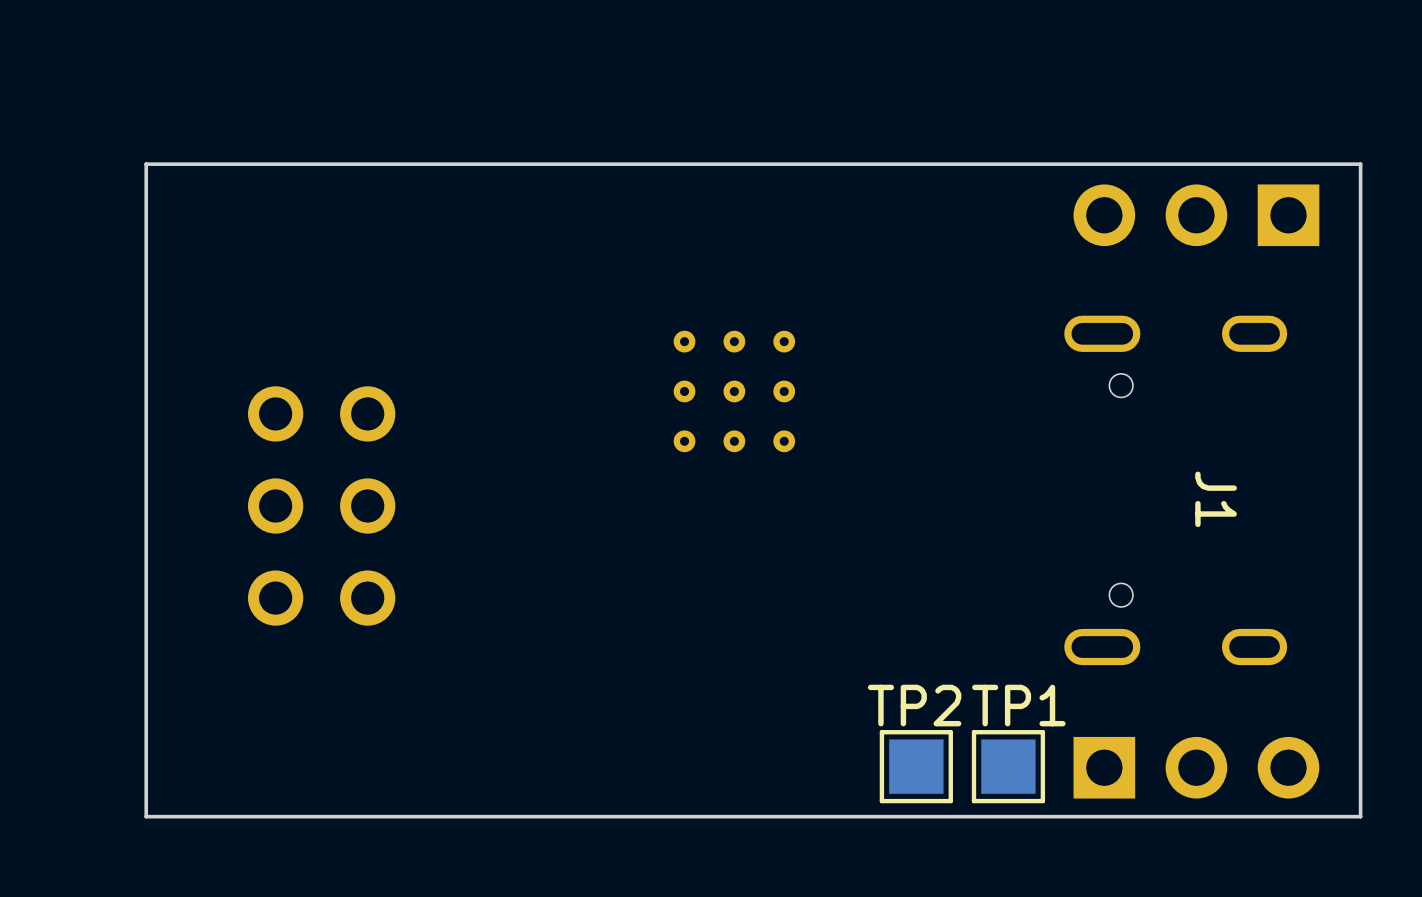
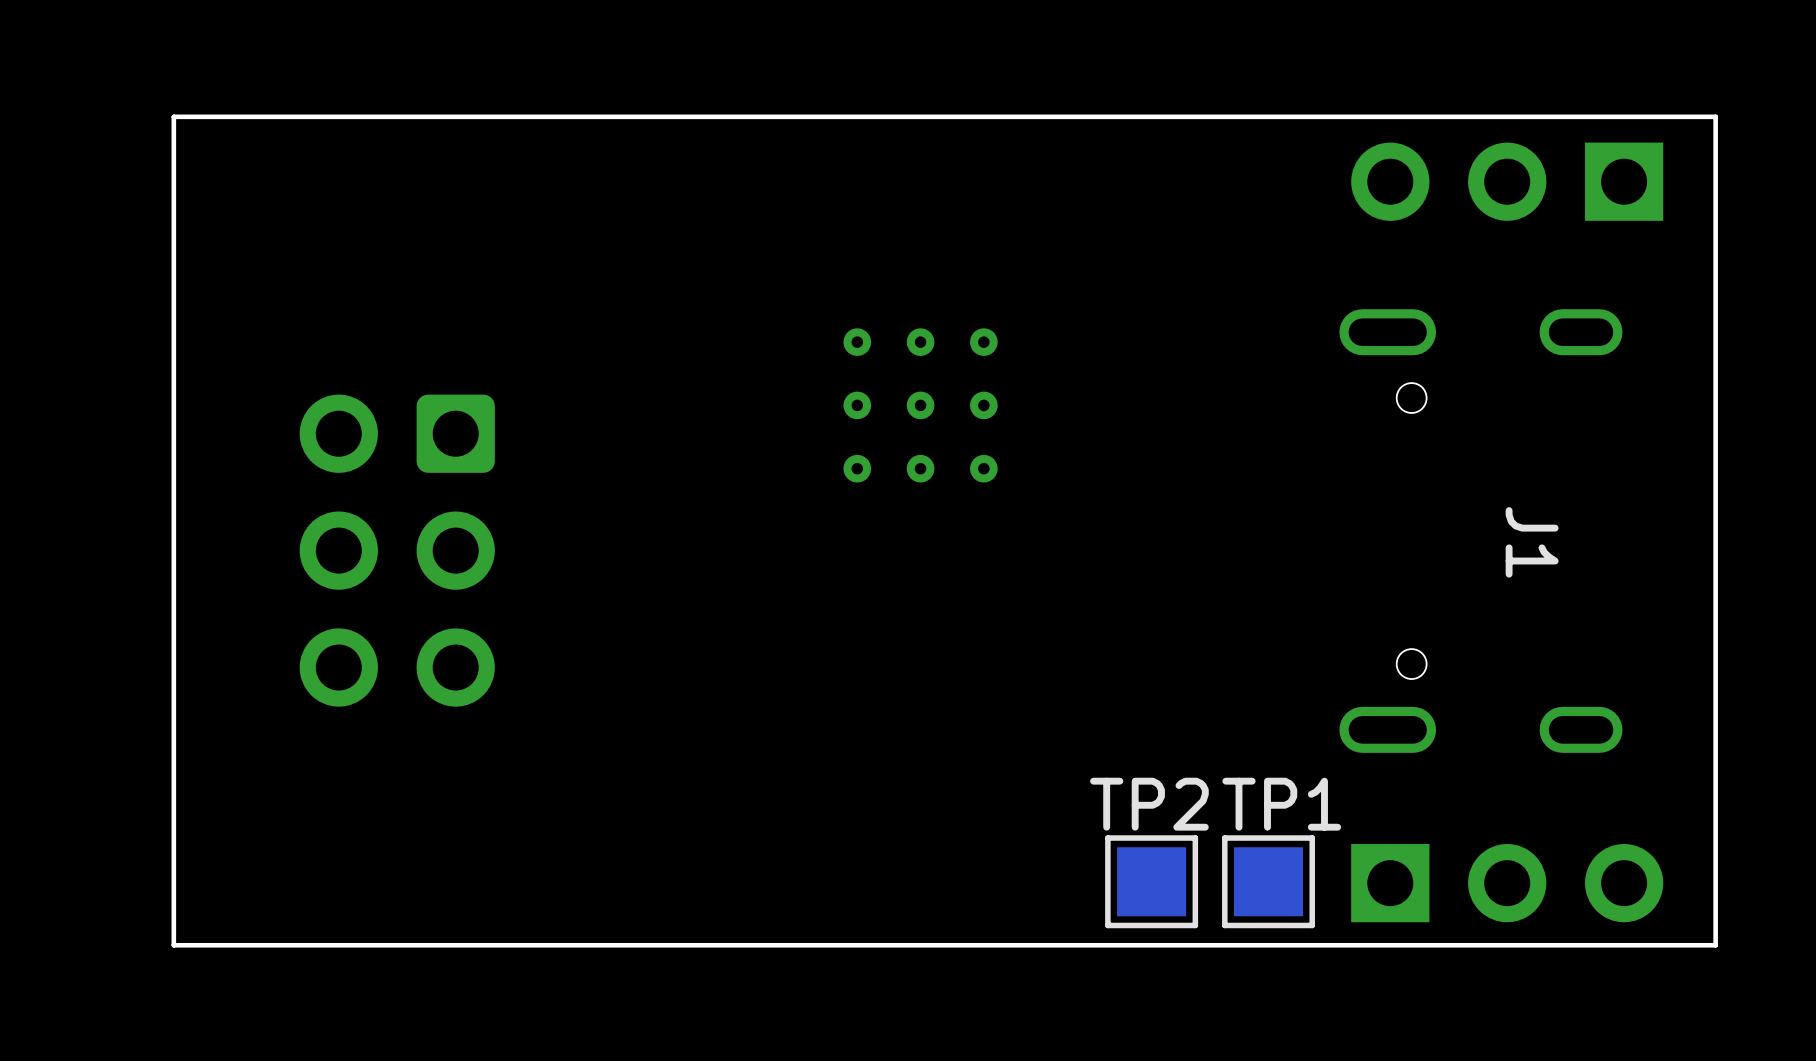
part footprint: [248, 386, 396, 626] -> [299, 394, 495, 707]

